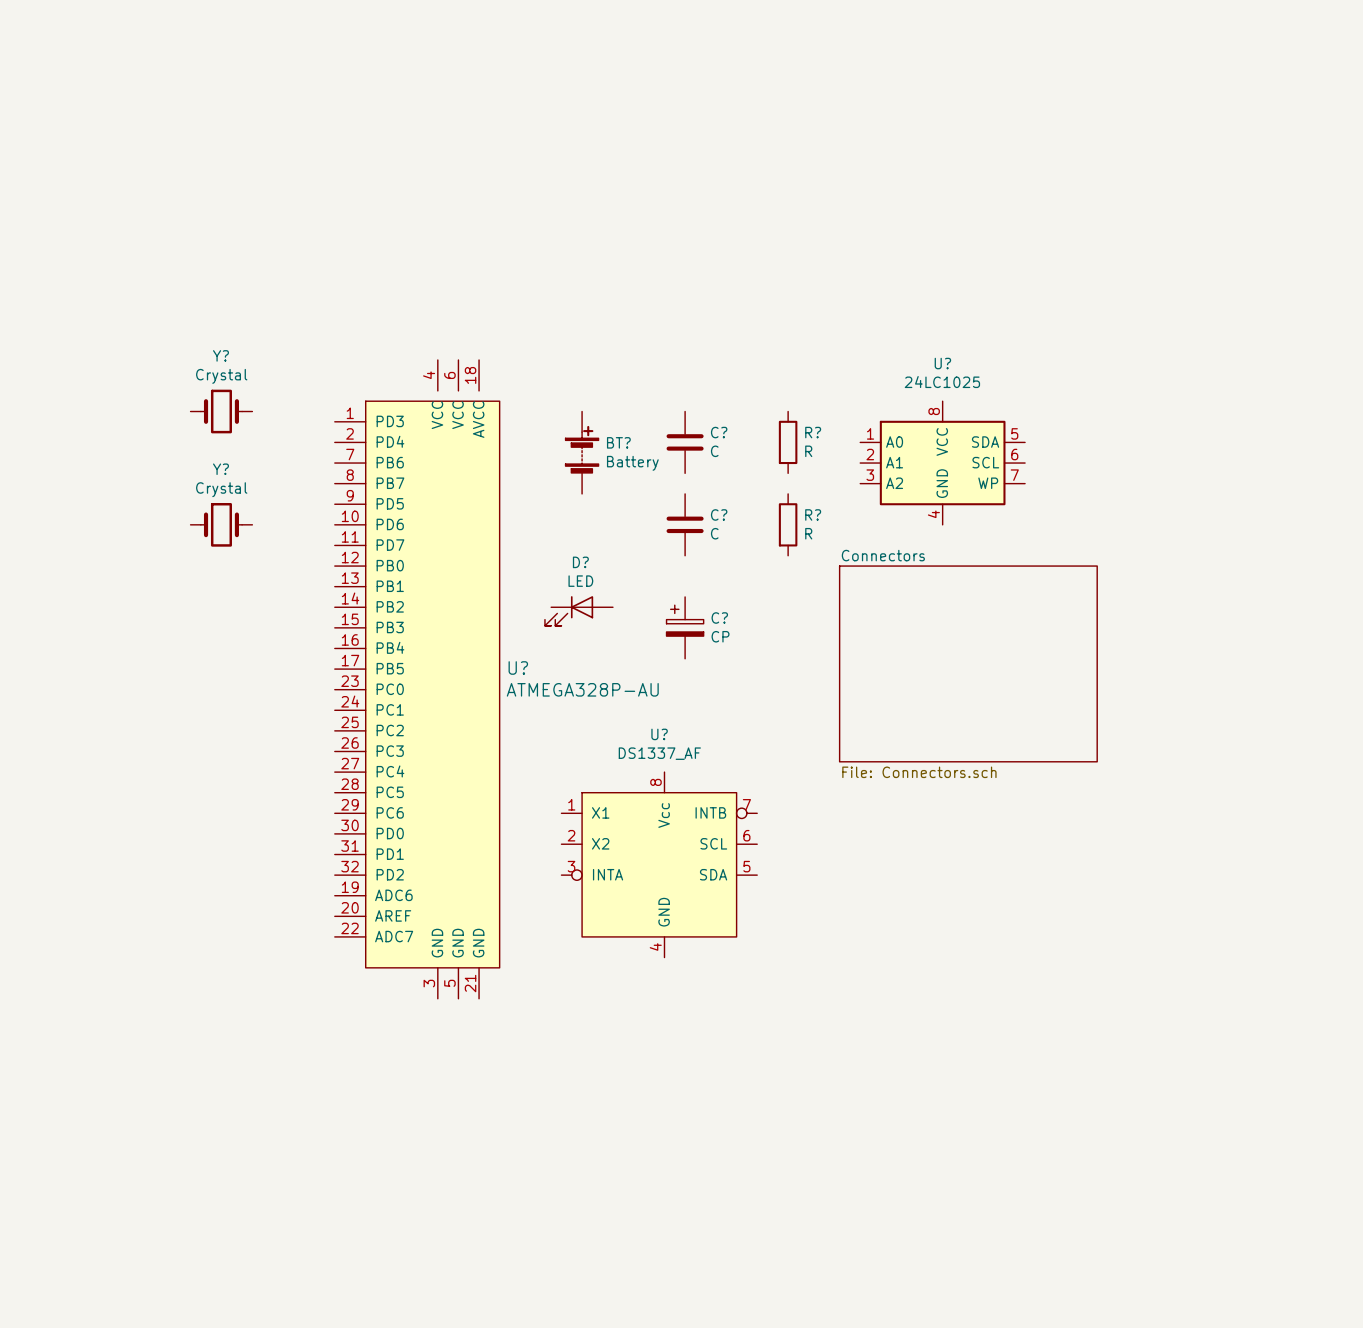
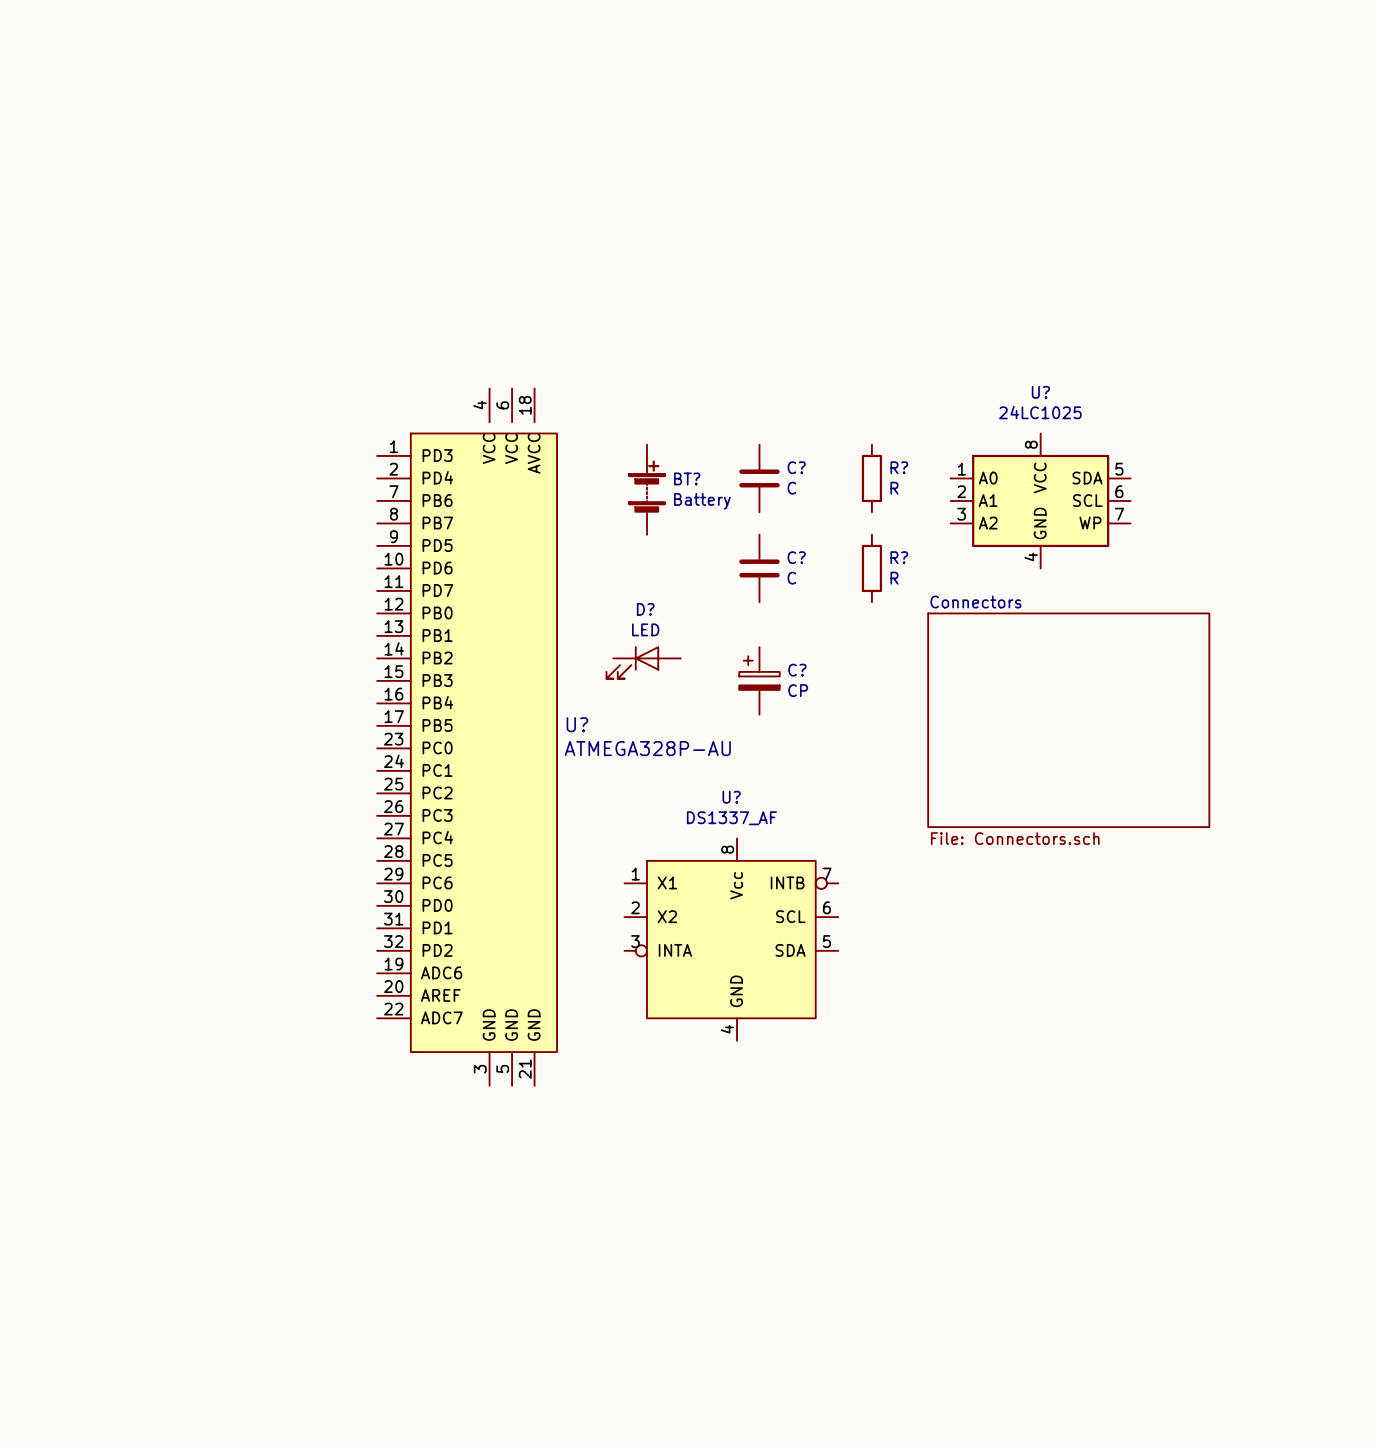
Y?: Crystal (221, 411) -> none
Y?: Crystal (221, 524) -> none

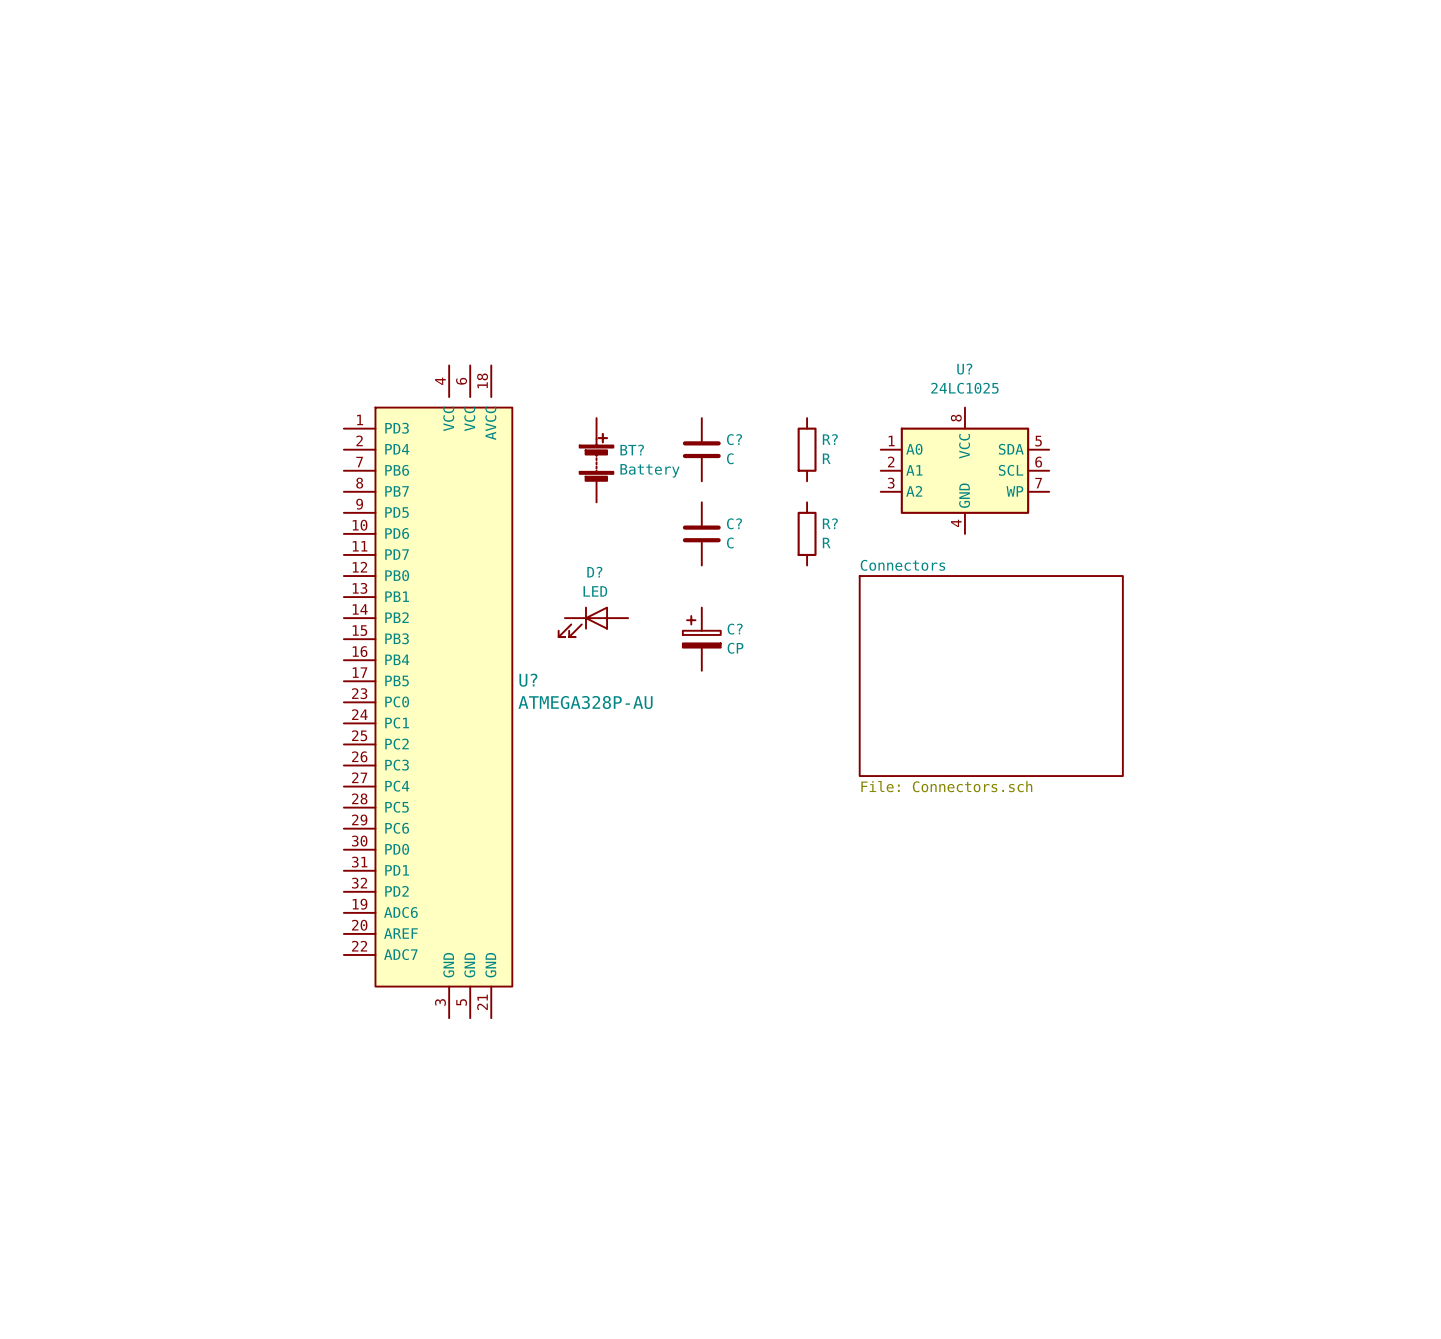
U?: DS1337_AF (731, 939) -> none

